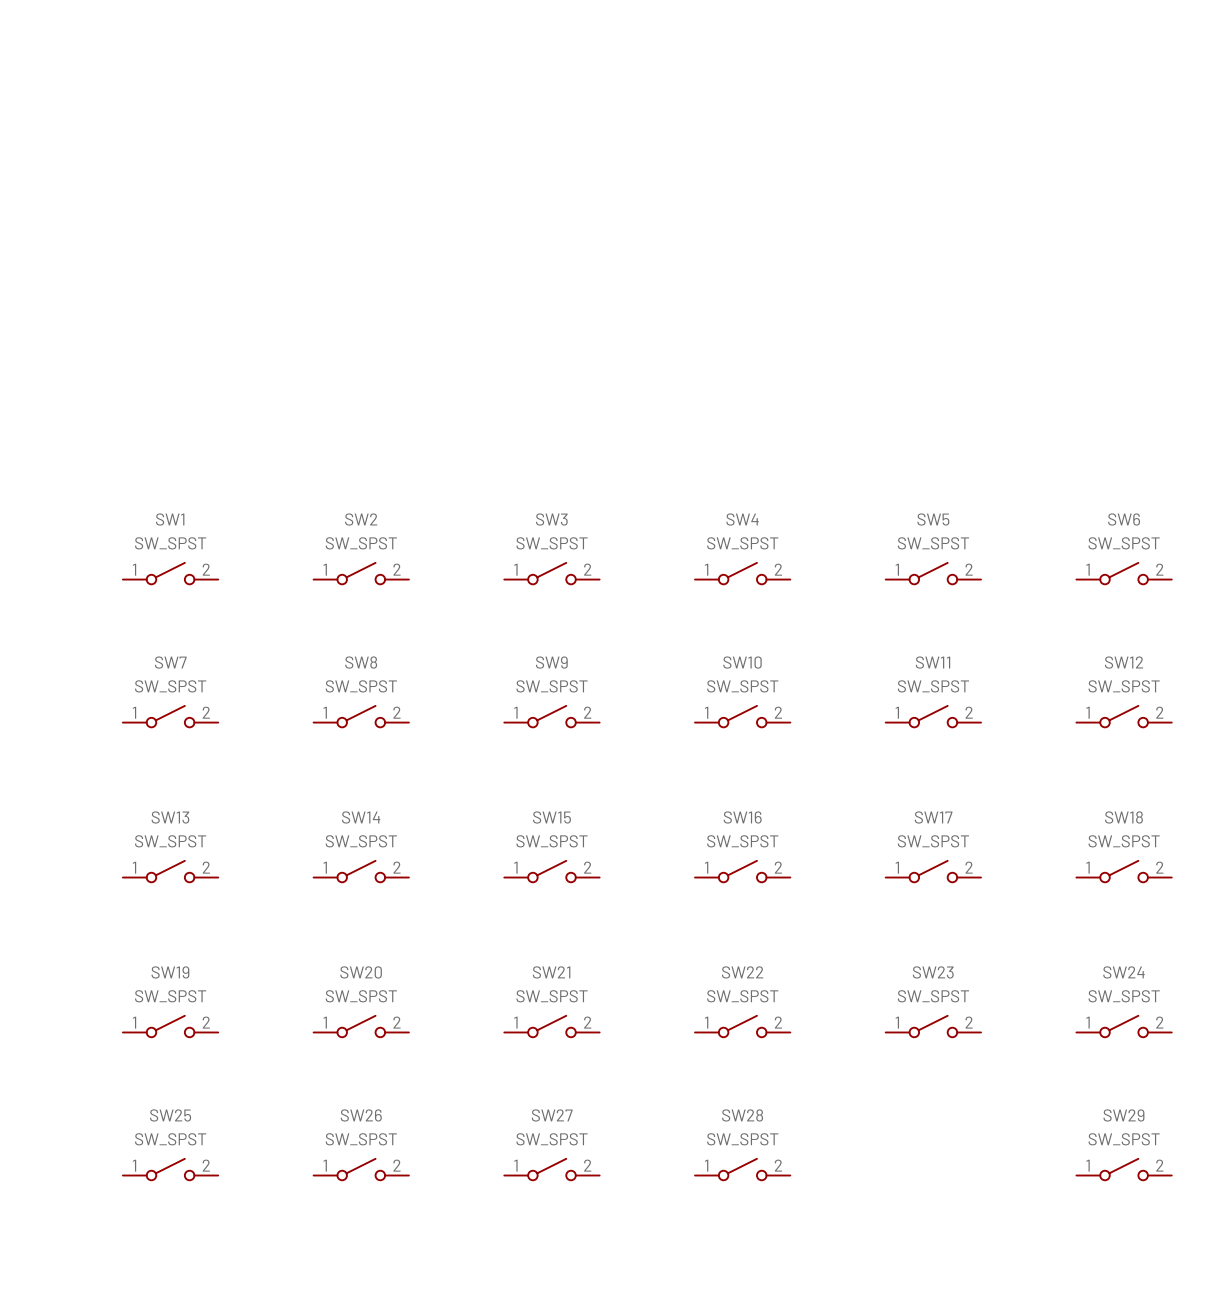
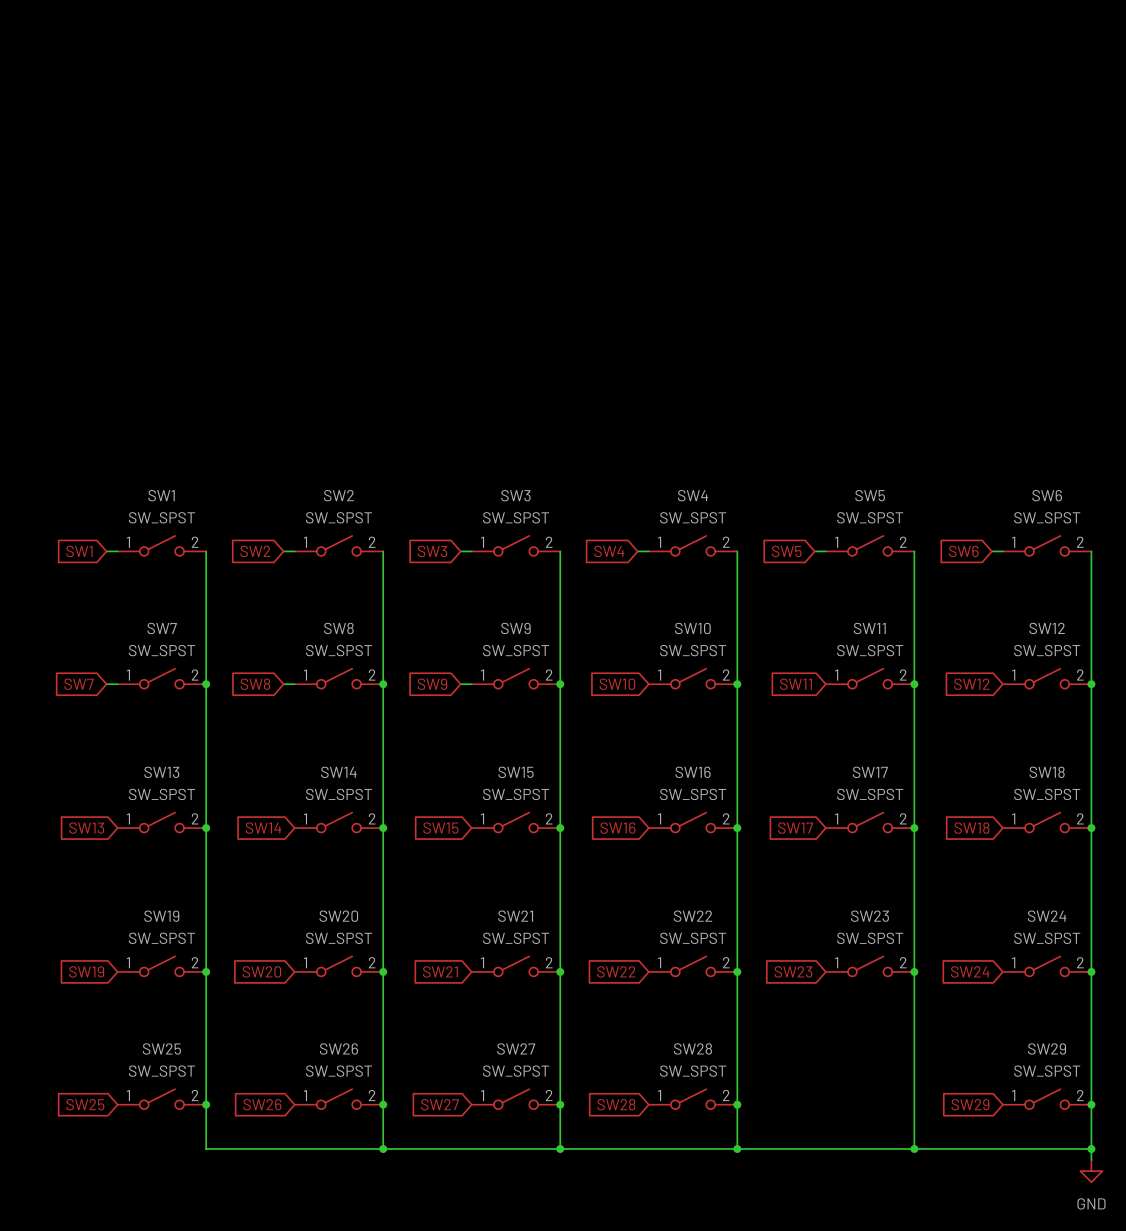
global label: none -> SW1 (79, 551)
wire: none -> (106, 551) (117, 551)
wire: none -> (206, 551) (206, 1148) (1091, 1148)
global label: none -> SW2 (255, 551)
wire: none -> (283, 551) (294, 551)
wire: none -> (383, 551) (383, 1148)
global label: none -> SW3 (432, 551)
wire: none -> (460, 551) (471, 551)
wire: none -> (560, 551) (560, 1148)
global label: none -> SW4 (609, 551)
wire: none -> (637, 551) (648, 551)
wire: none -> (737, 551) (737, 1148)
global label: none -> SW5 (786, 551)
wire: none -> (814, 551) (825, 551)
wire: none -> (914, 551) (914, 1148)
global label: none -> SW6 (963, 551)
wire: none -> (991, 551) (1002, 551)
wire: none -> (1091, 551) (1091, 1160)
global label: none -> SW7 (79, 684)
wire: none -> (106, 684) (117, 684)
junction: none -> (206, 684)
global label: none -> SW8 (255, 684)
wire: none -> (283, 684) (294, 684)
junction: none -> (383, 684)
global label: none -> SW9 (432, 684)
wire: none -> (460, 684) (471, 684)
junction: none -> (560, 684)
global label: none -> SW10 (617, 684)
junction: none -> (737, 684)
global label: none -> SW11 (795, 684)
junction: none -> (914, 684)
global label: none -> SW12 (971, 684)
junction: none -> (1091, 684)
global label: none -> SW13 (86, 828)
junction: none -> (206, 828)
global label: none -> SW14 (263, 828)
junction: none -> (383, 828)
global label: none -> SW15 (440, 828)
junction: none -> (560, 828)
global label: none -> SW16 (617, 828)
junction: none -> (737, 828)
global label: none -> SW17 (795, 828)
junction: none -> (914, 828)
global label: none -> SW18 (971, 828)
junction: none -> (1091, 828)
global label: none -> SW19 (86, 971)
junction: none -> (206, 971)
global label: none -> SW20 (261, 971)
junction: none -> (383, 971)
global label: none -> SW21 (440, 971)
junction: none -> (560, 971)
global label: none -> SW22 (616, 971)
junction: none -> (737, 971)
global label: none -> SW23 (793, 971)
junction: none -> (914, 971)
global label: none -> SW24 (970, 971)
junction: none -> (1091, 971)
global label: none -> SW25 (85, 1104)
junction: none -> (206, 1104)
global label: none -> SW26 (262, 1104)
junction: none -> (383, 1104)
global label: none -> SW27 (439, 1104)
junction: none -> (560, 1104)
global label: none -> SW28 (616, 1104)
junction: none -> (737, 1104)
global label: none -> SW29 (970, 1104)
junction: none -> (1091, 1104)
junction: none -> (383, 1148)
junction: none -> (560, 1148)
junction: none -> (737, 1148)
junction: none -> (914, 1148)
junction: none -> (1091, 1148)
power symbol: none -> GND (1091, 1171)

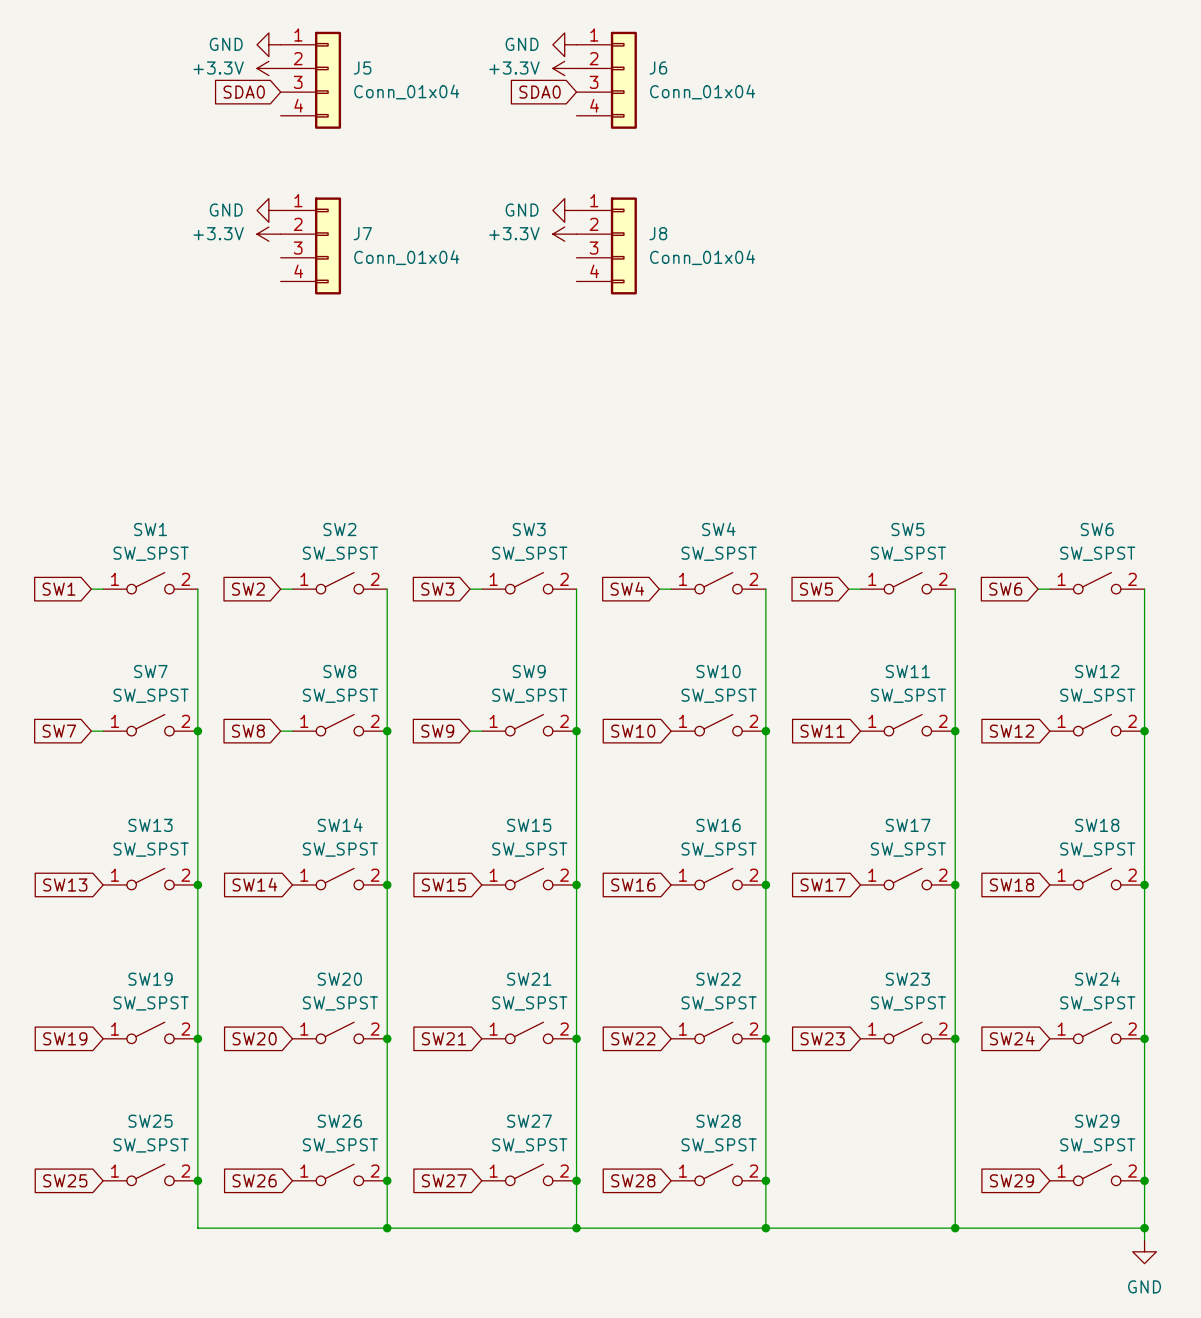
power symbol: none -> GND (268, 44)
power symbol: none -> GND (564, 44)
power symbol: none -> +3.3V (268, 68)
power symbol: none -> +3.3V (564, 68)
J5: none -> Conn_01x04 (310, 80)
J6: none -> Conn_01x04 (606, 80)
global label: none -> SDA0 (244, 92)
global label: none -> SDA0 (540, 92)
power symbol: none -> GND (268, 210)
power symbol: none -> GND (564, 210)
power symbol: none -> +3.3V (268, 234)
power symbol: none -> +3.3V (564, 234)
J7: none -> Conn_01x04 (310, 245)
J8: none -> Conn_01x04 (606, 245)

